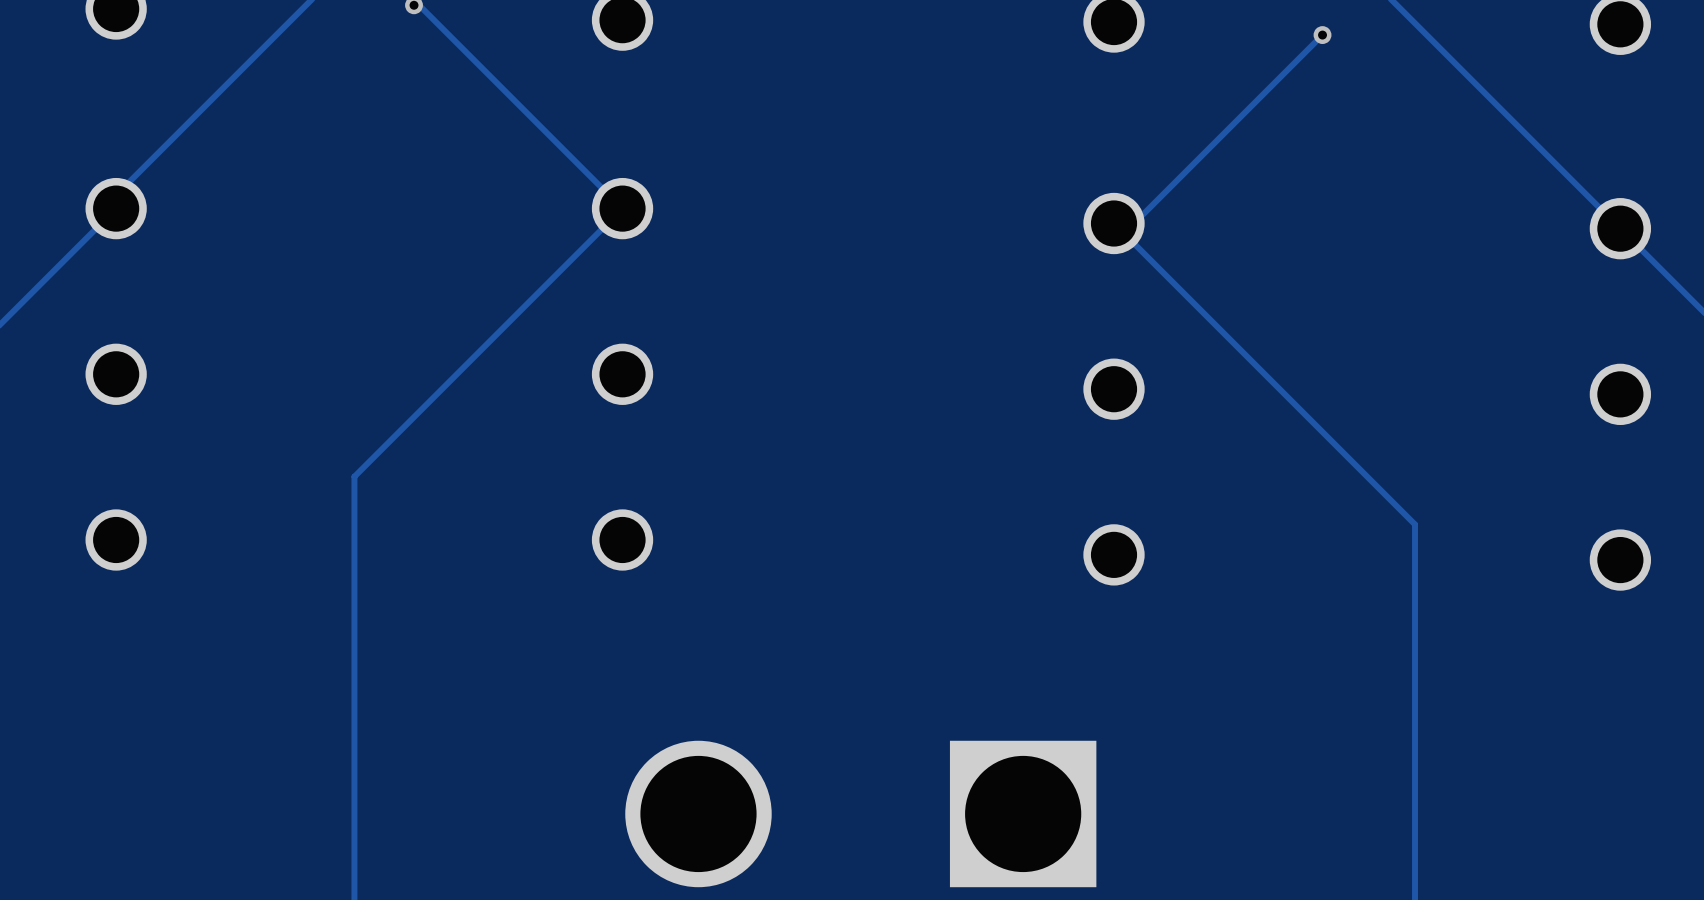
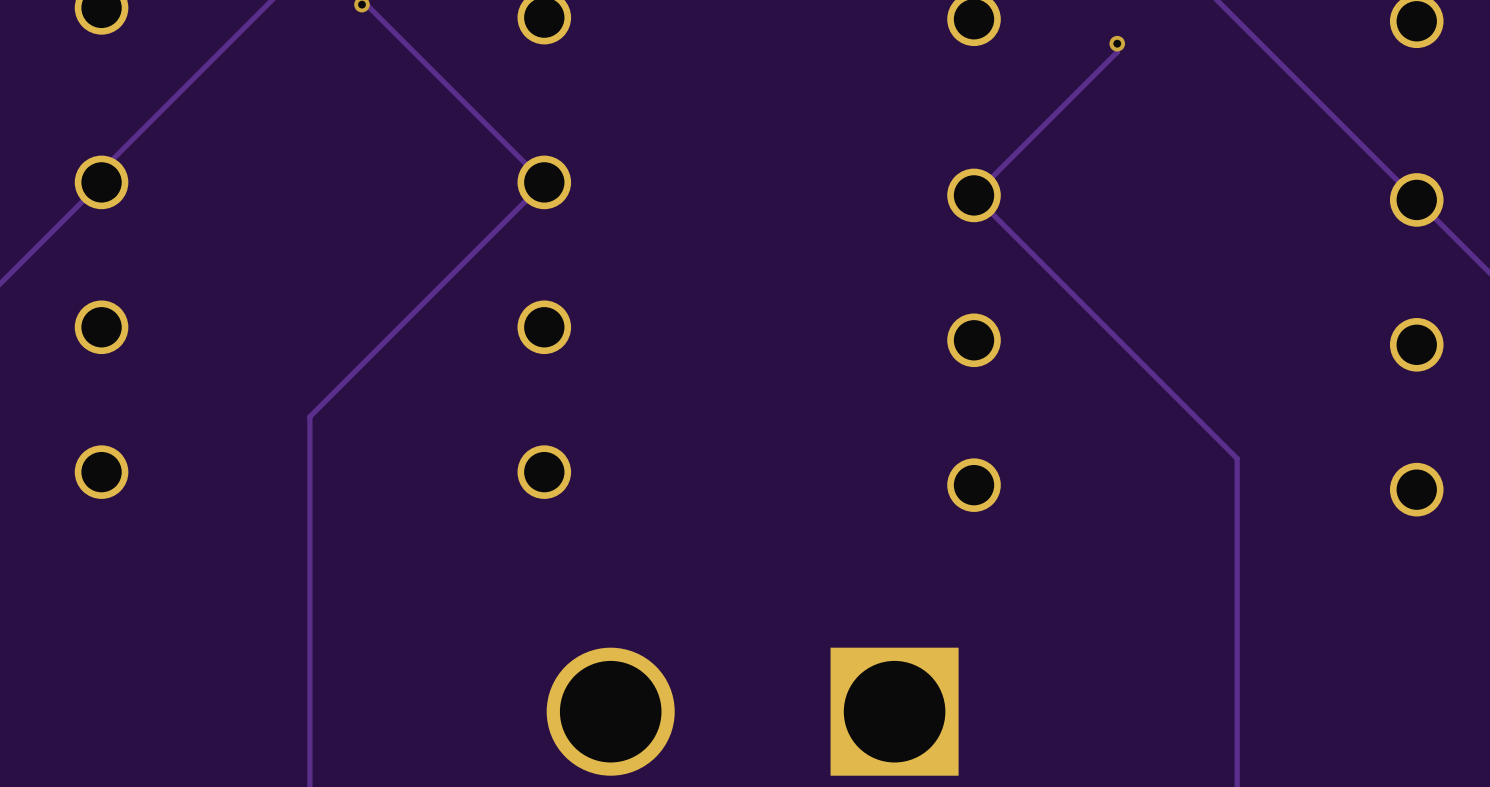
track: (1322, 35) (1134, 223) (1114, 223) -> (1117, 43) (1117, 52) (974, 195)
via position: (1322, 35) -> (1117, 43)

